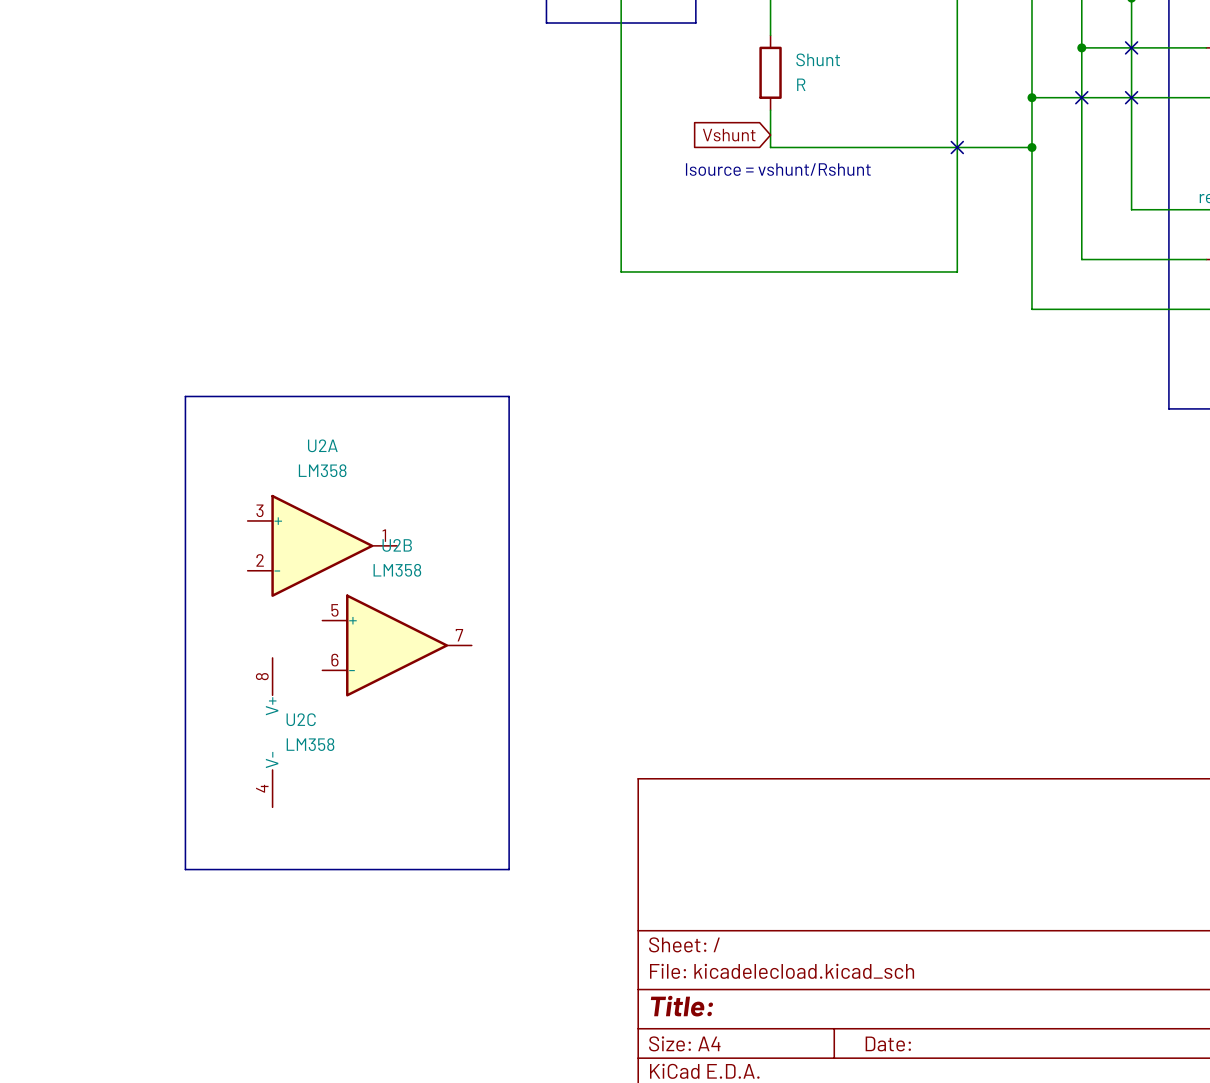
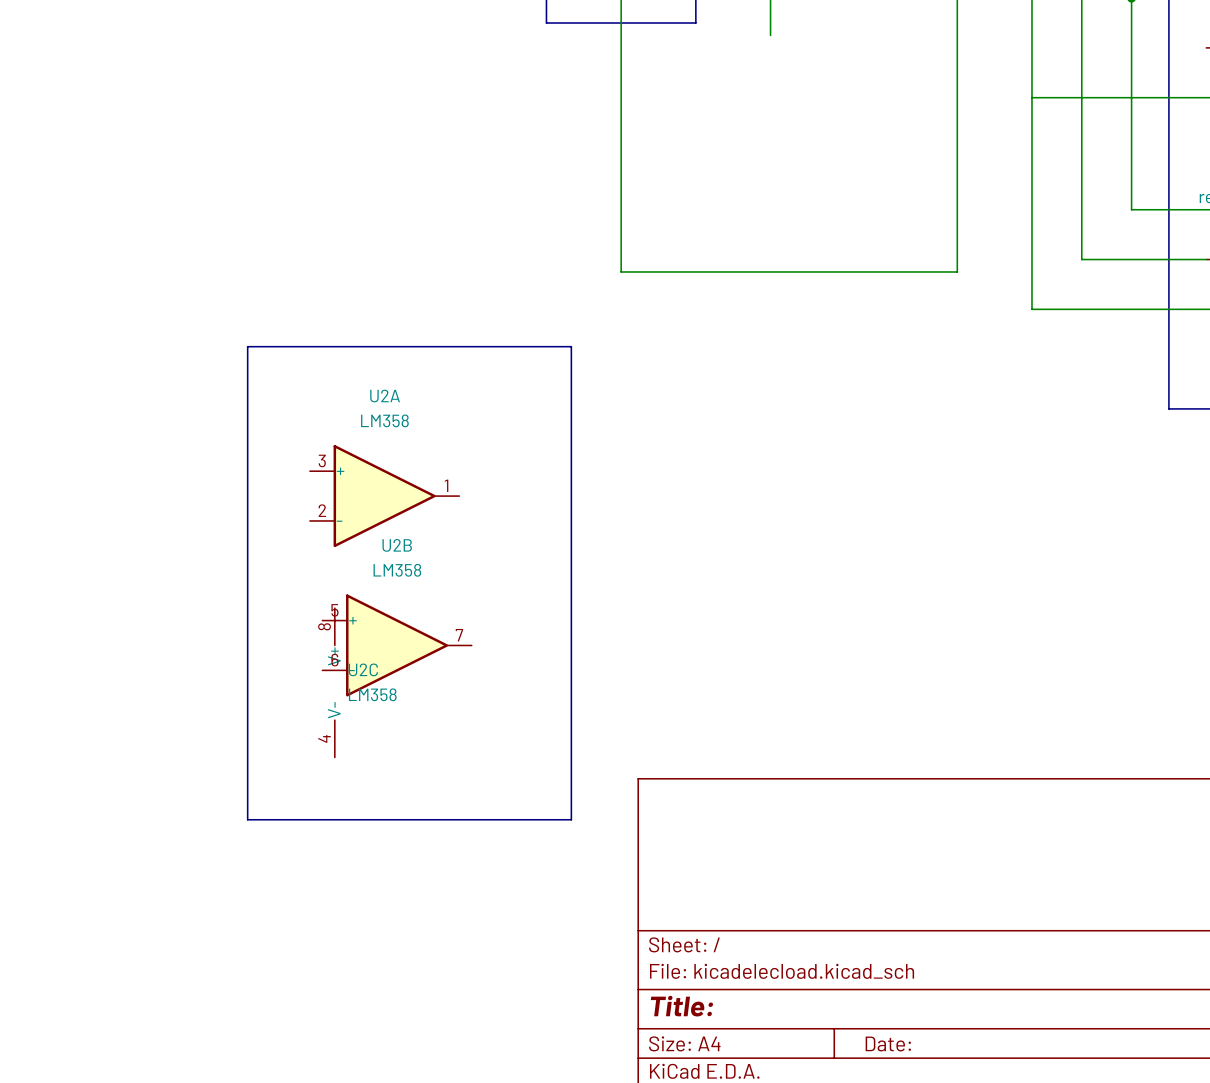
wire: (1081, 47) (1206, 47) -> none
junction: (1081, 47) -> none
no-connect mark: (1131, 47) -> none
Shunt: R (770, 72) -> none
junction: (1031, 97) -> none
no-connect mark: (1081, 97) -> none
no-connect mark: (1131, 97) -> none
wire: (770, 110) (770, 147) (1031, 147) -> none
global label: Vshunt (729, 135) -> none
no-connect mark: (957, 147) -> none
junction: (1031, 147) -> none
text: Isource = vshunt/Rshunt (778, 169) -> none
line: (185, 396) (509, 396) (509, 869) (185, 869) (185, 396) -> (247, 346) (571, 346) (571, 819) (247, 819) (247, 346)
U2A position: (322, 545) -> (384, 496)
U2C position: (272, 732) -> (334, 682)

